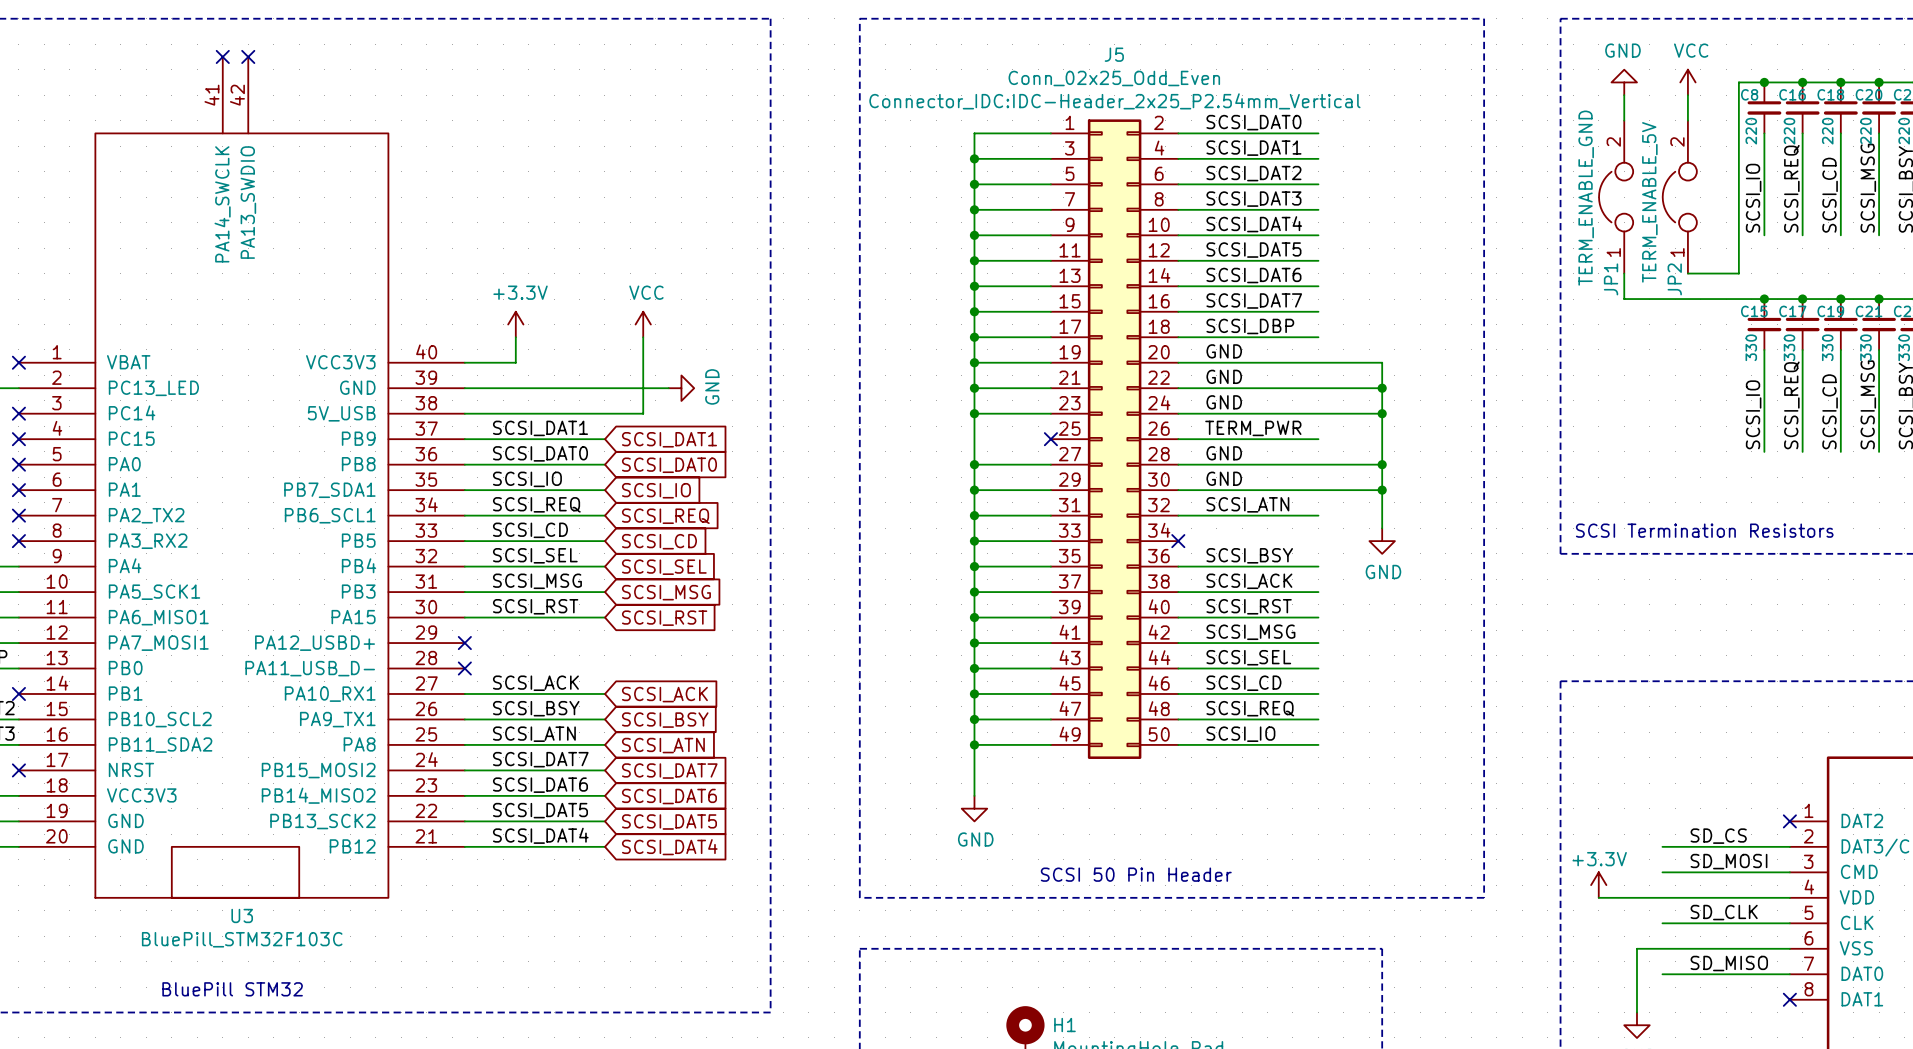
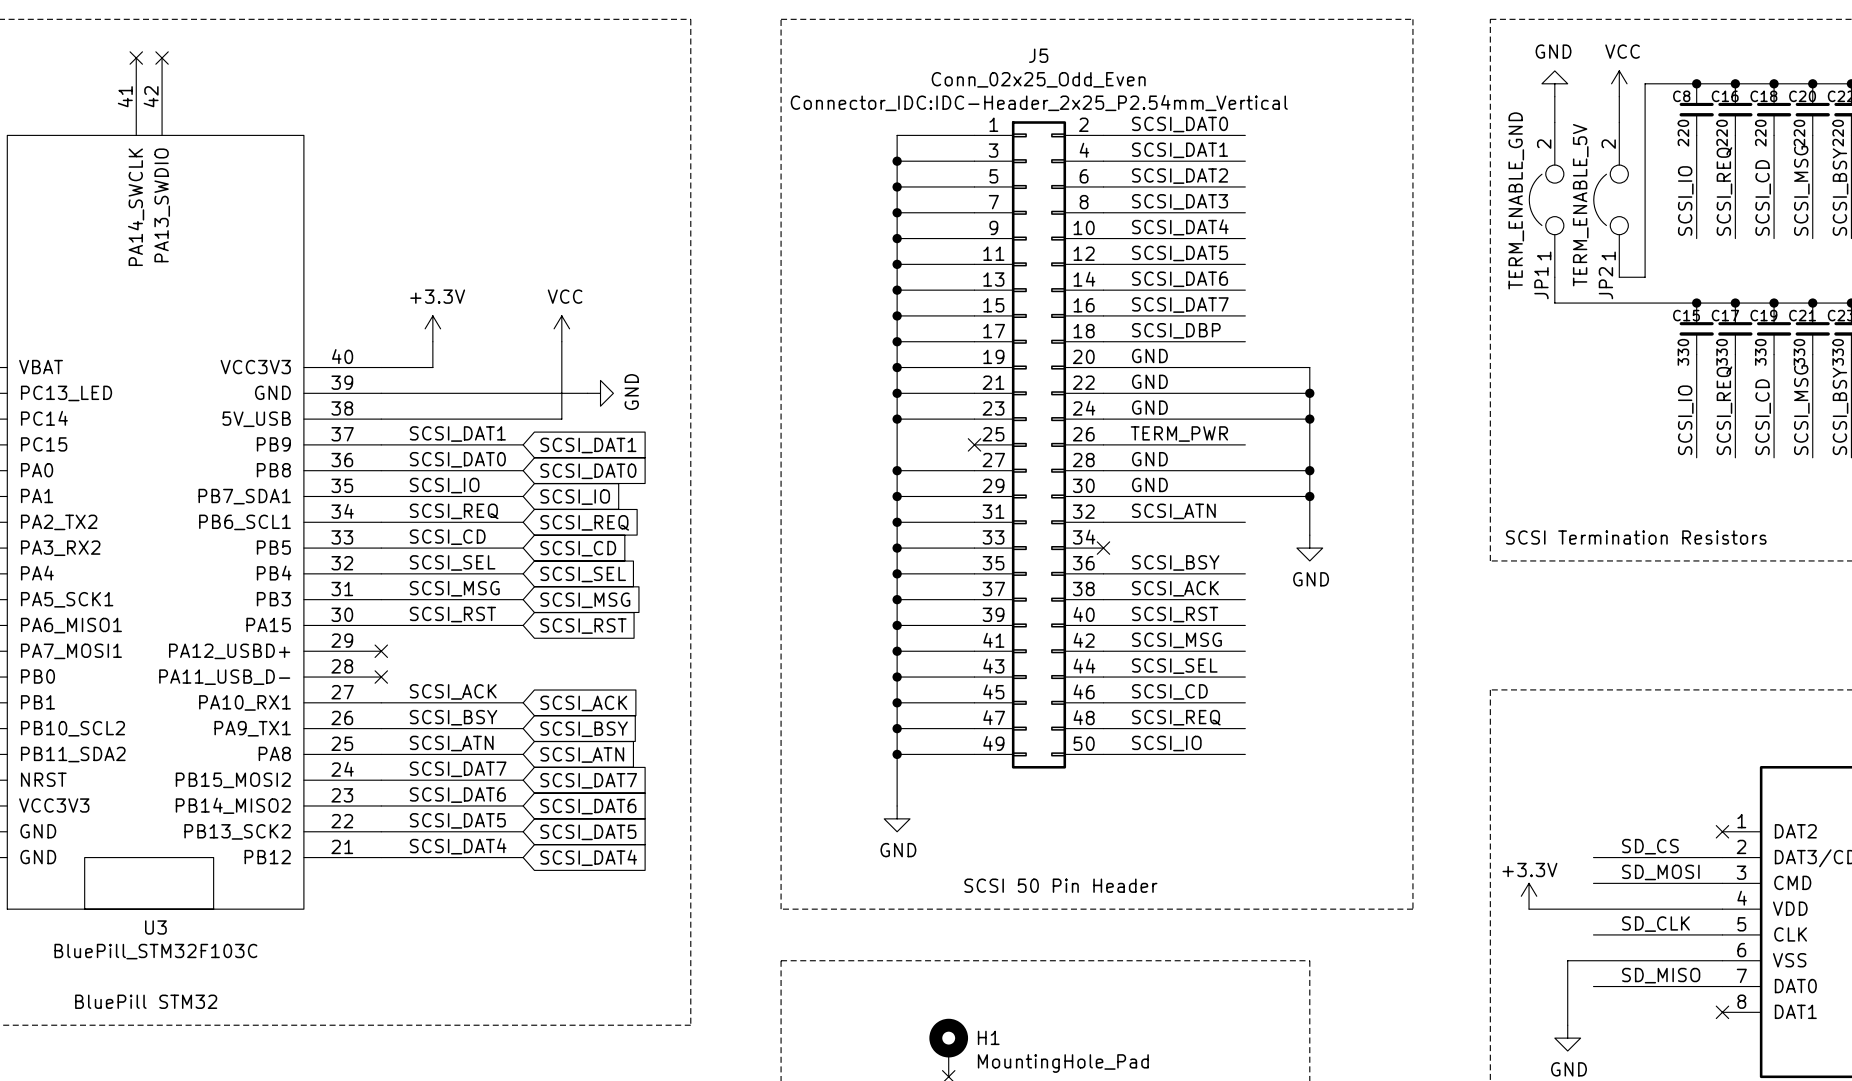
wire: (1738, 82) (1738, 273) (1713, 273) -> (1670, 83) (1645, 83) (1645, 277)

